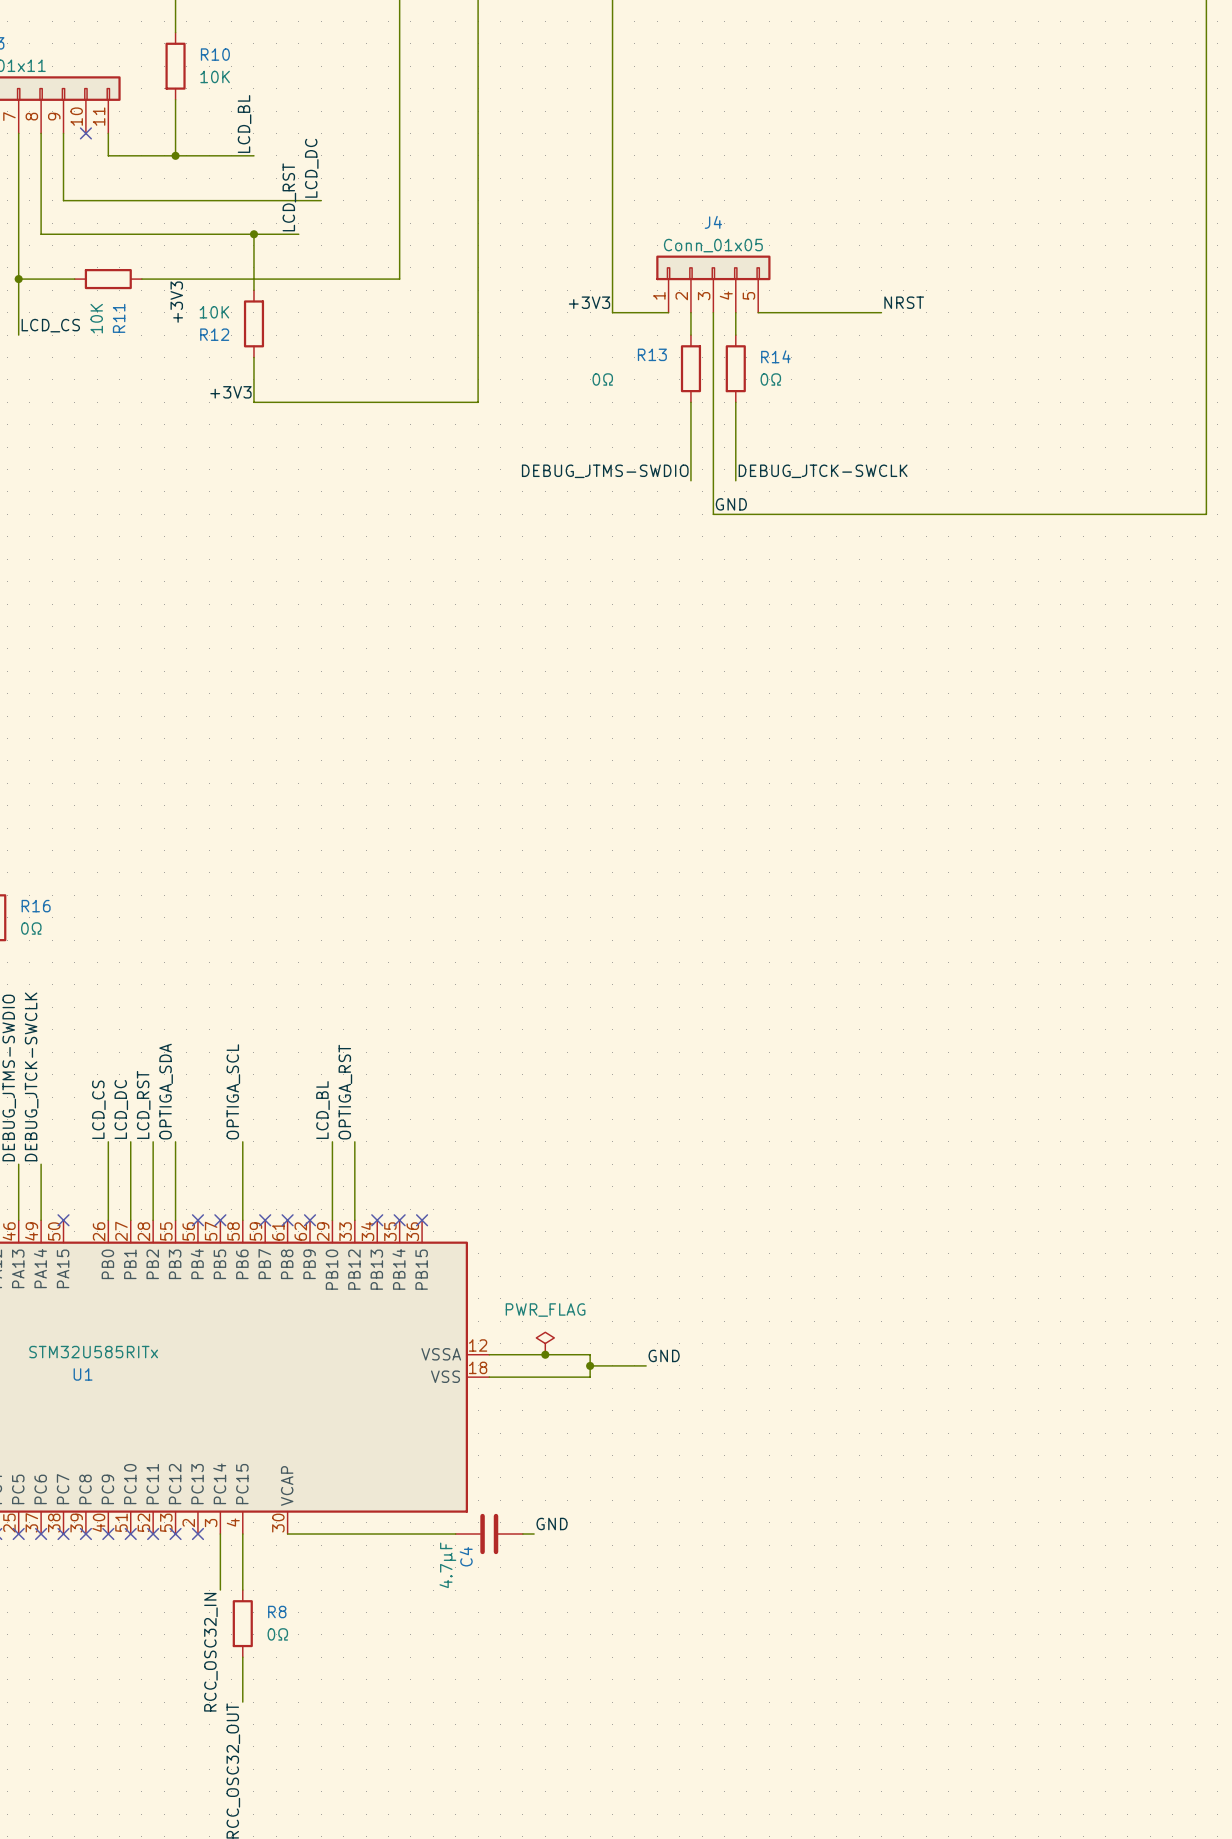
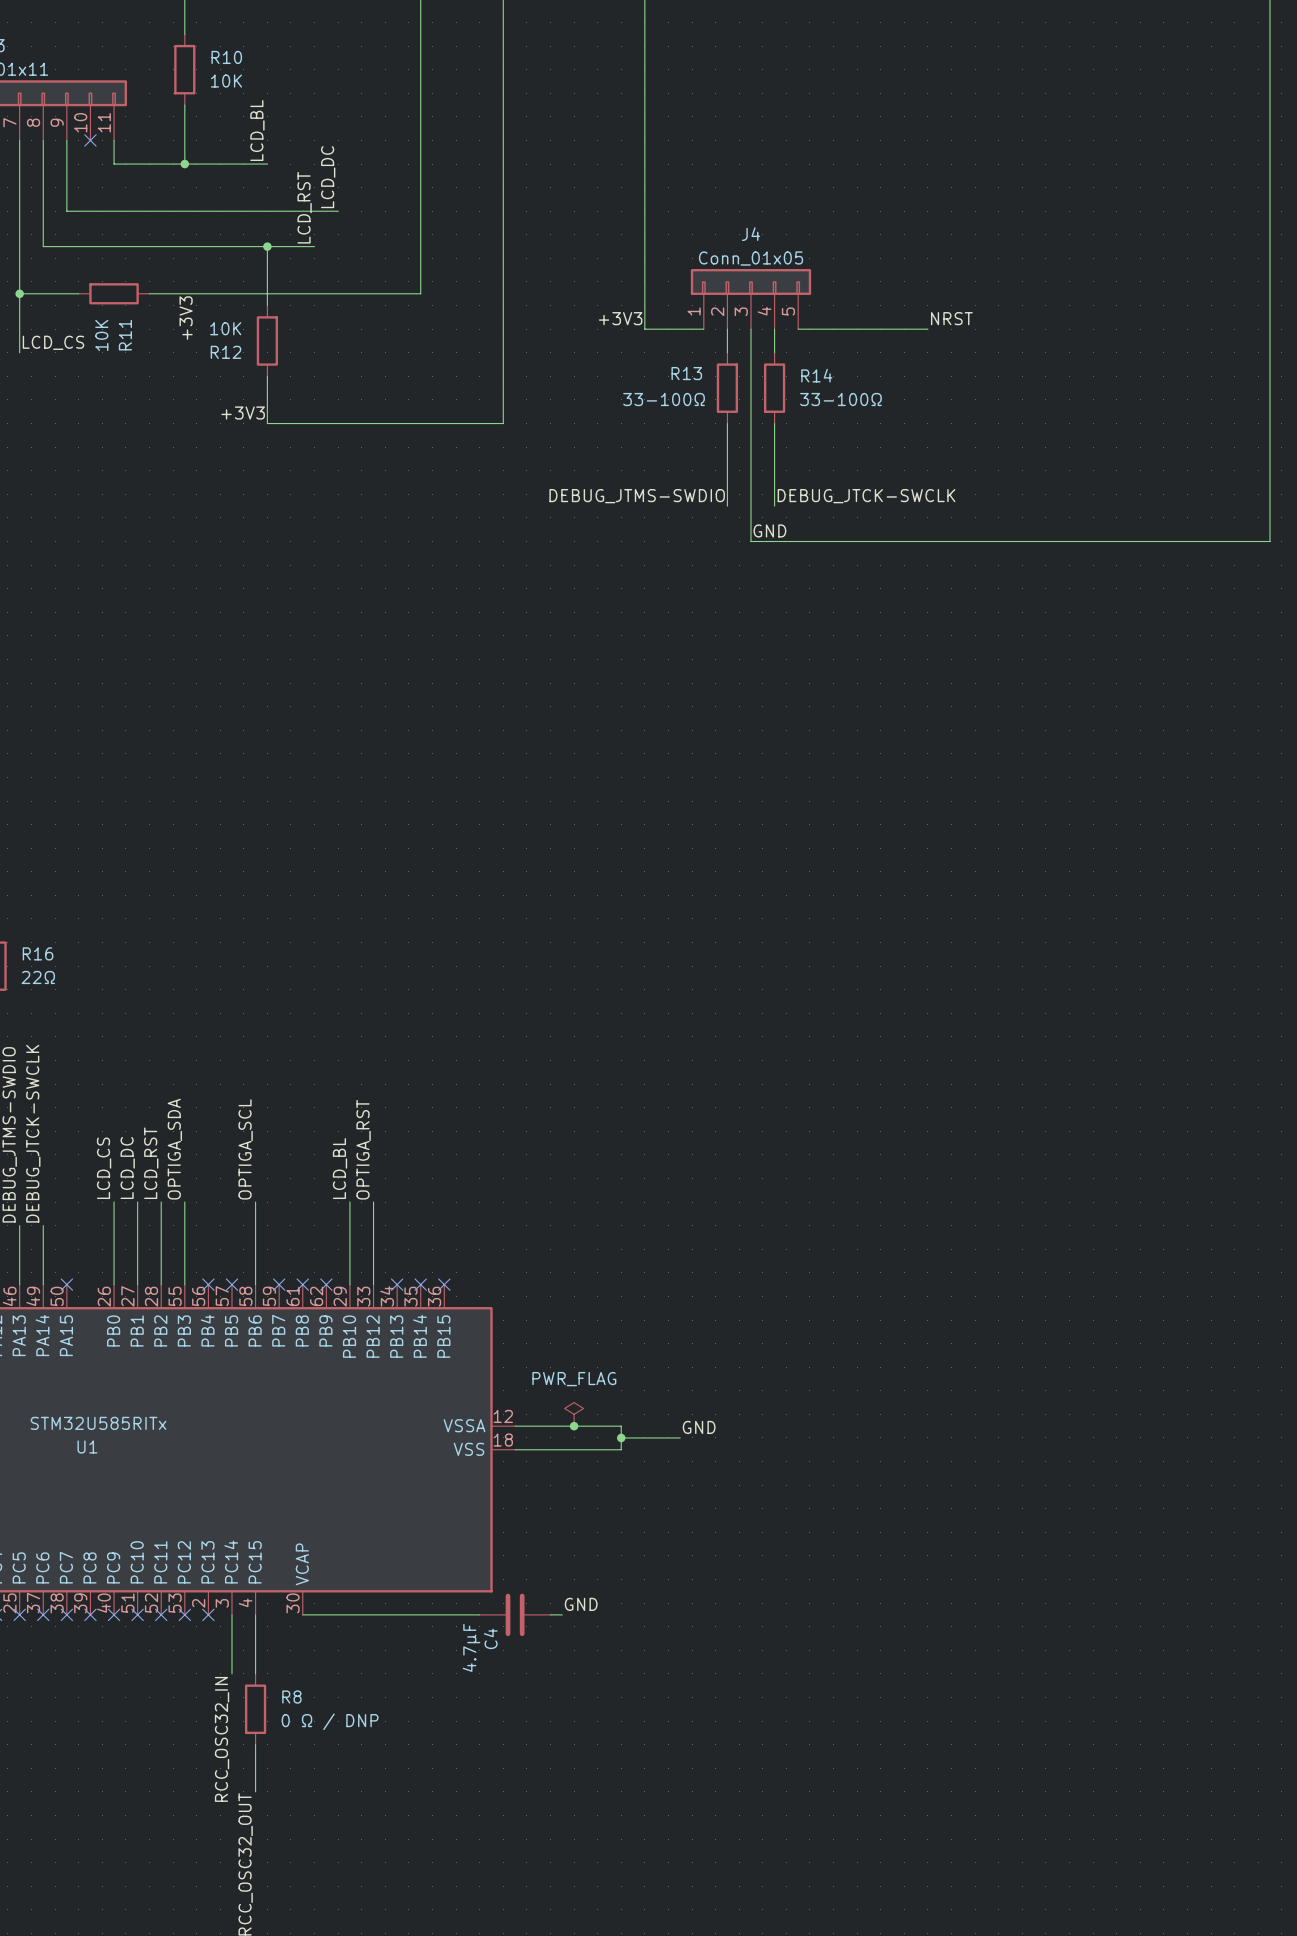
R13 value: 0Ω (602, 379) -> 33-100Ω (664, 399)
R14 value: 0Ω (770, 379) -> 33-100Ω (840, 399)
R16 value: 0Ω (31, 928) -> 22Ω (38, 977)
R8 value: 0Ω (277, 1634) -> 0 Ω / DNP (330, 1721)

